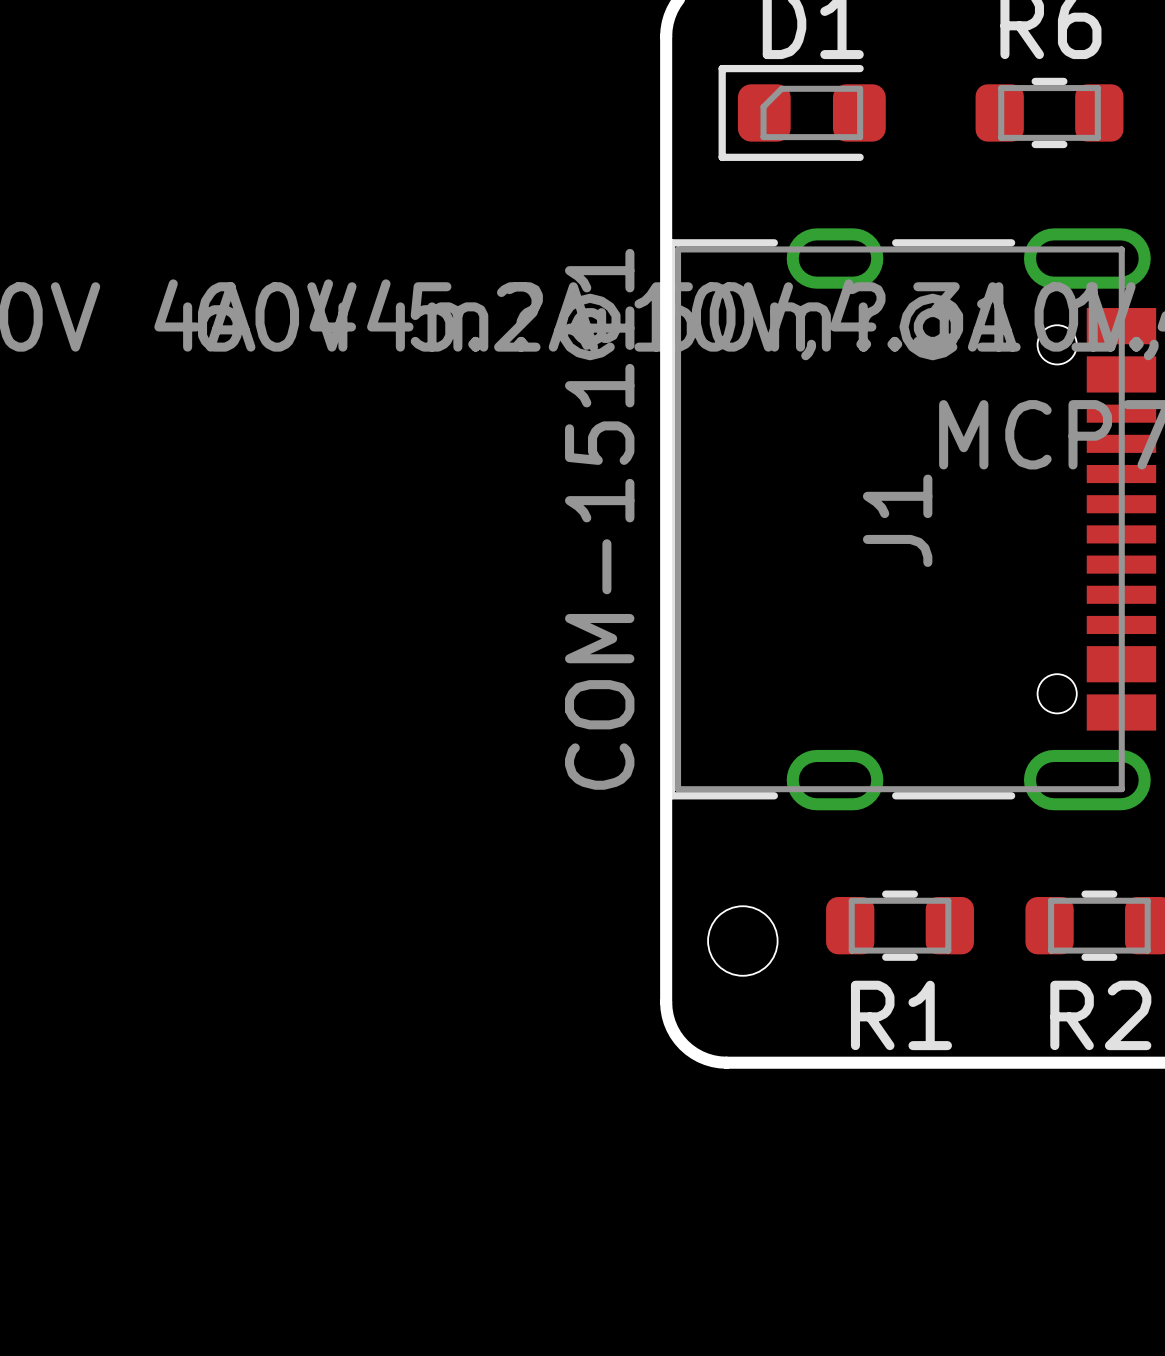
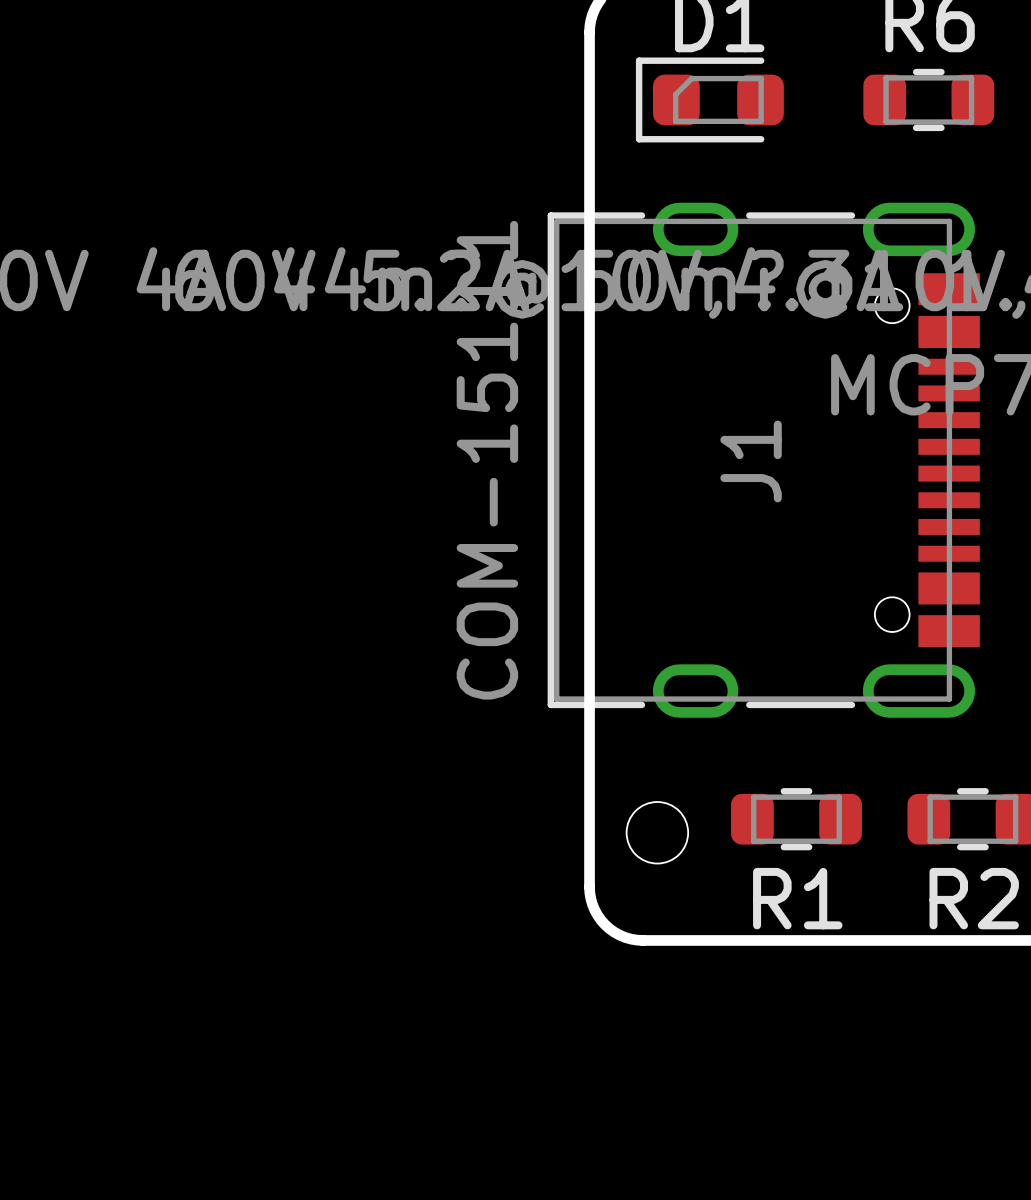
J1 position: (911, 519) -> (763, 460)

